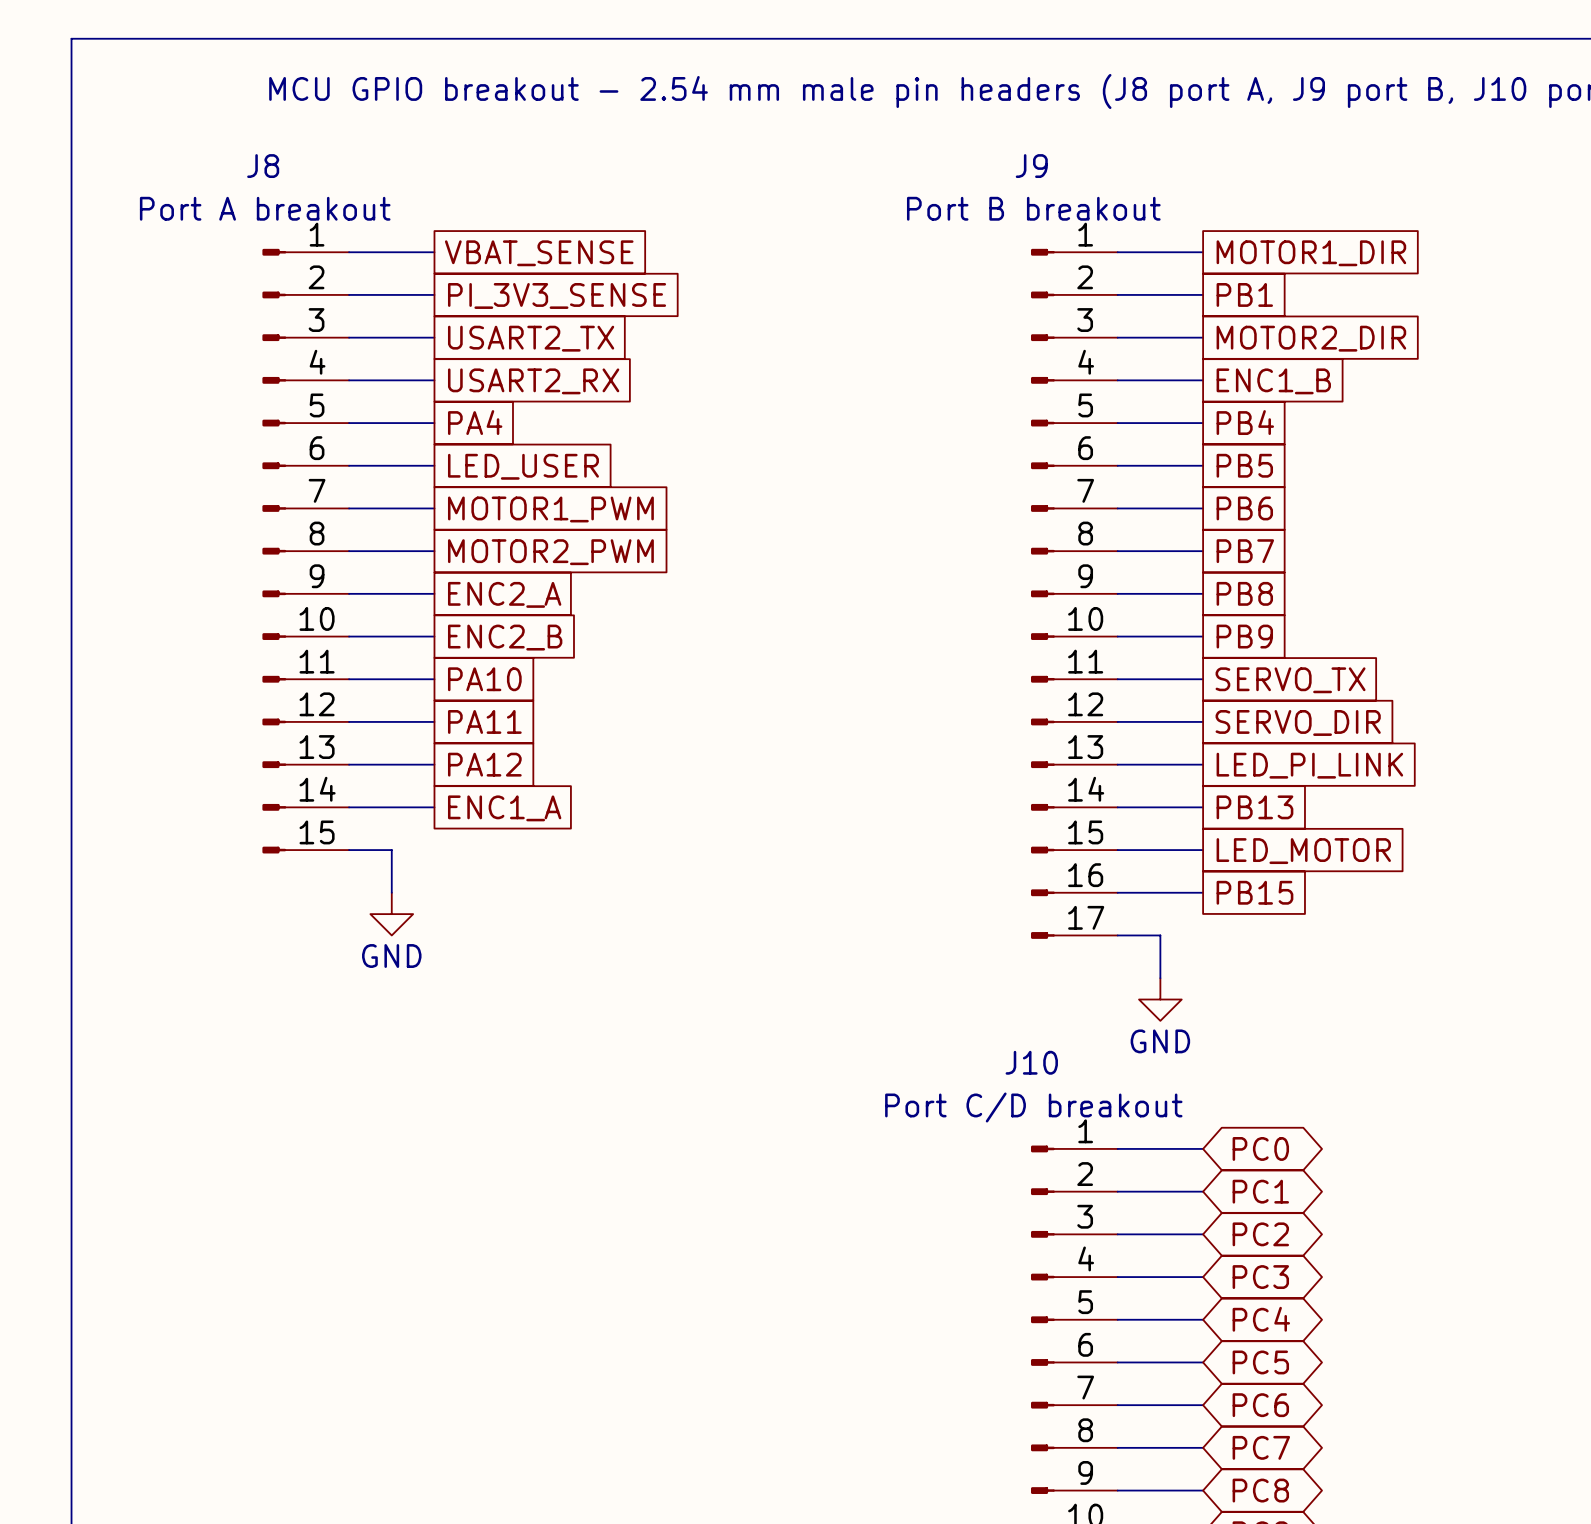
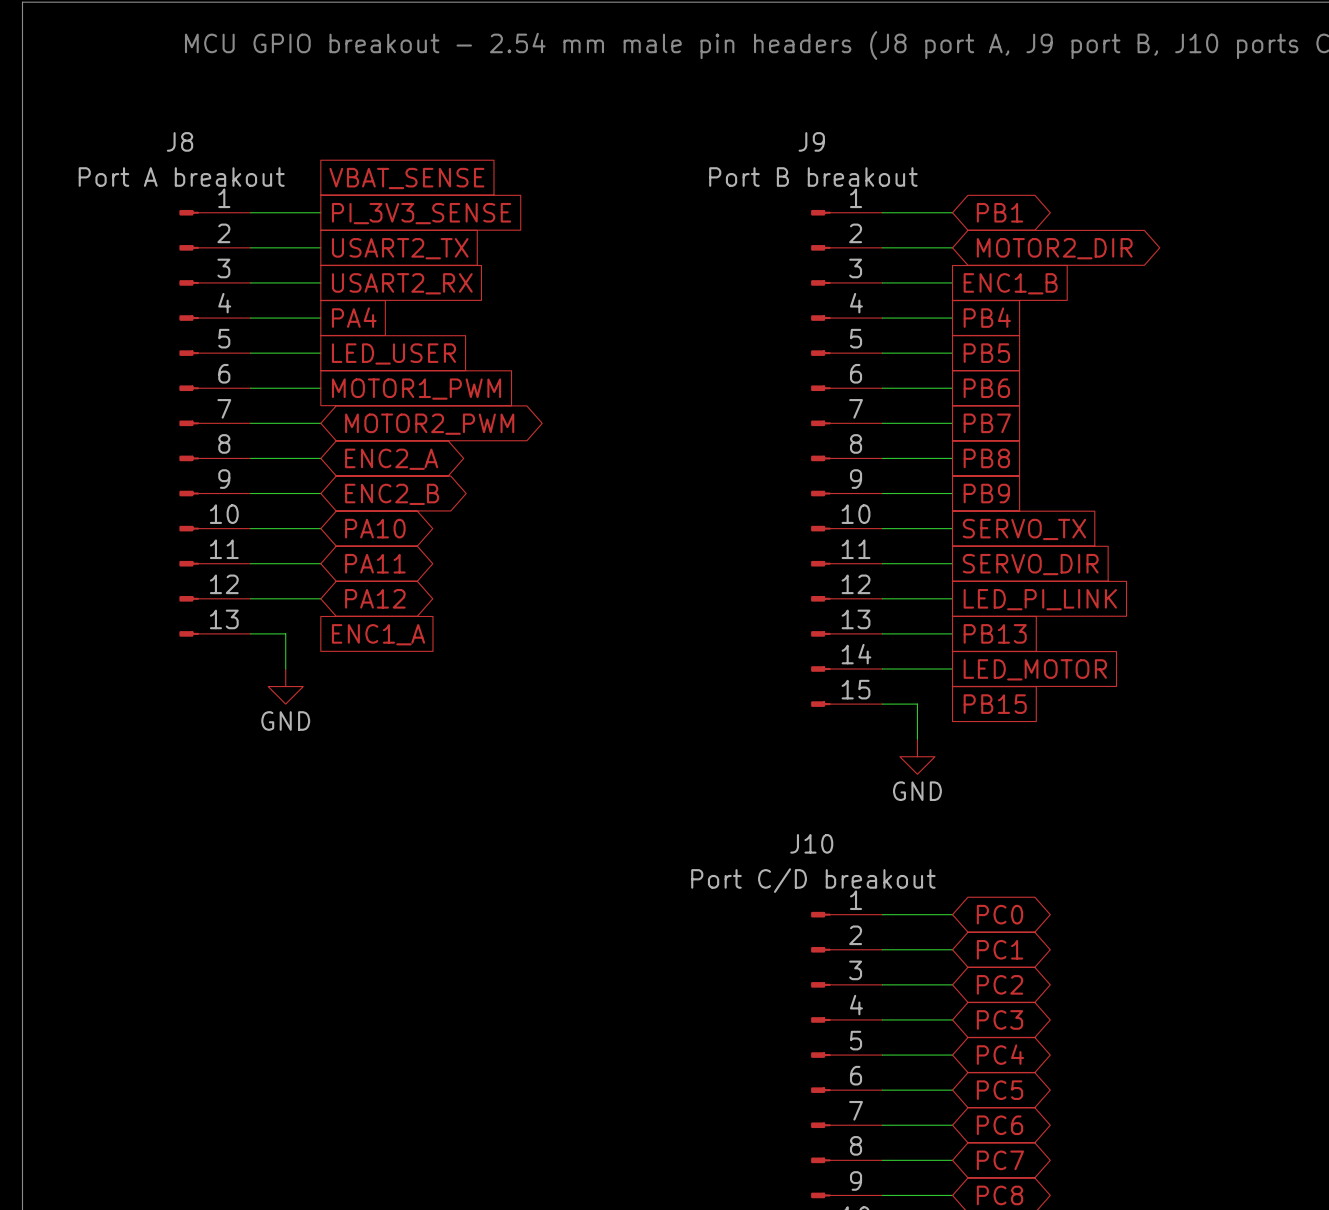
J8 name position: J8 (263, 166) -> J8 (180, 141)
J9 name position: J9 (1031, 166) -> J9 (811, 141)
J8 value position: Port A breakout (265, 208) -> Port A breakout (181, 177)
J9 value position: Port B breakout (1033, 208) -> Port B breakout (813, 177)
J8 symbol: [262, 248, 350, 854] -> [179, 209, 251, 637]
J9 symbol: [1030, 248, 1118, 939] -> [811, 209, 883, 707]
wire: (349, 252) (434, 252) -> none
wire: (1117, 252) (1203, 252) -> none
global label: MOTOR1_DIR (1311, 253) -> none
global label shape: passive (1244, 294) -> bidirectional (999, 212)
global label shape: passive (1311, 338) -> bidirectional (1054, 248)
global label shape: passive (550, 552) -> bidirectional (429, 424)
global label shape: passive (504, 594) -> bidirectional (391, 459)
global label shape: passive (505, 637) -> bidirectional (392, 494)
global label shape: passive (484, 679) -> bidirectional (375, 528)
global label shape: passive (484, 721) -> bidirectional (375, 563)
global label shape: passive (484, 764) -> bidirectional (375, 598)
wire: (391, 807) (434, 807) -> (285, 633) (285, 669)
wire: (349, 850) (391, 850) (391, 892) -> none
wire: (1160, 892) (1203, 892) -> (917, 704) (917, 739)
power symbol position: GND (391, 914) -> GND (285, 686)
wire: (1117, 935) (1160, 935) (1160, 978) -> none
power symbol position: GND (1160, 999) -> GND (917, 756)

